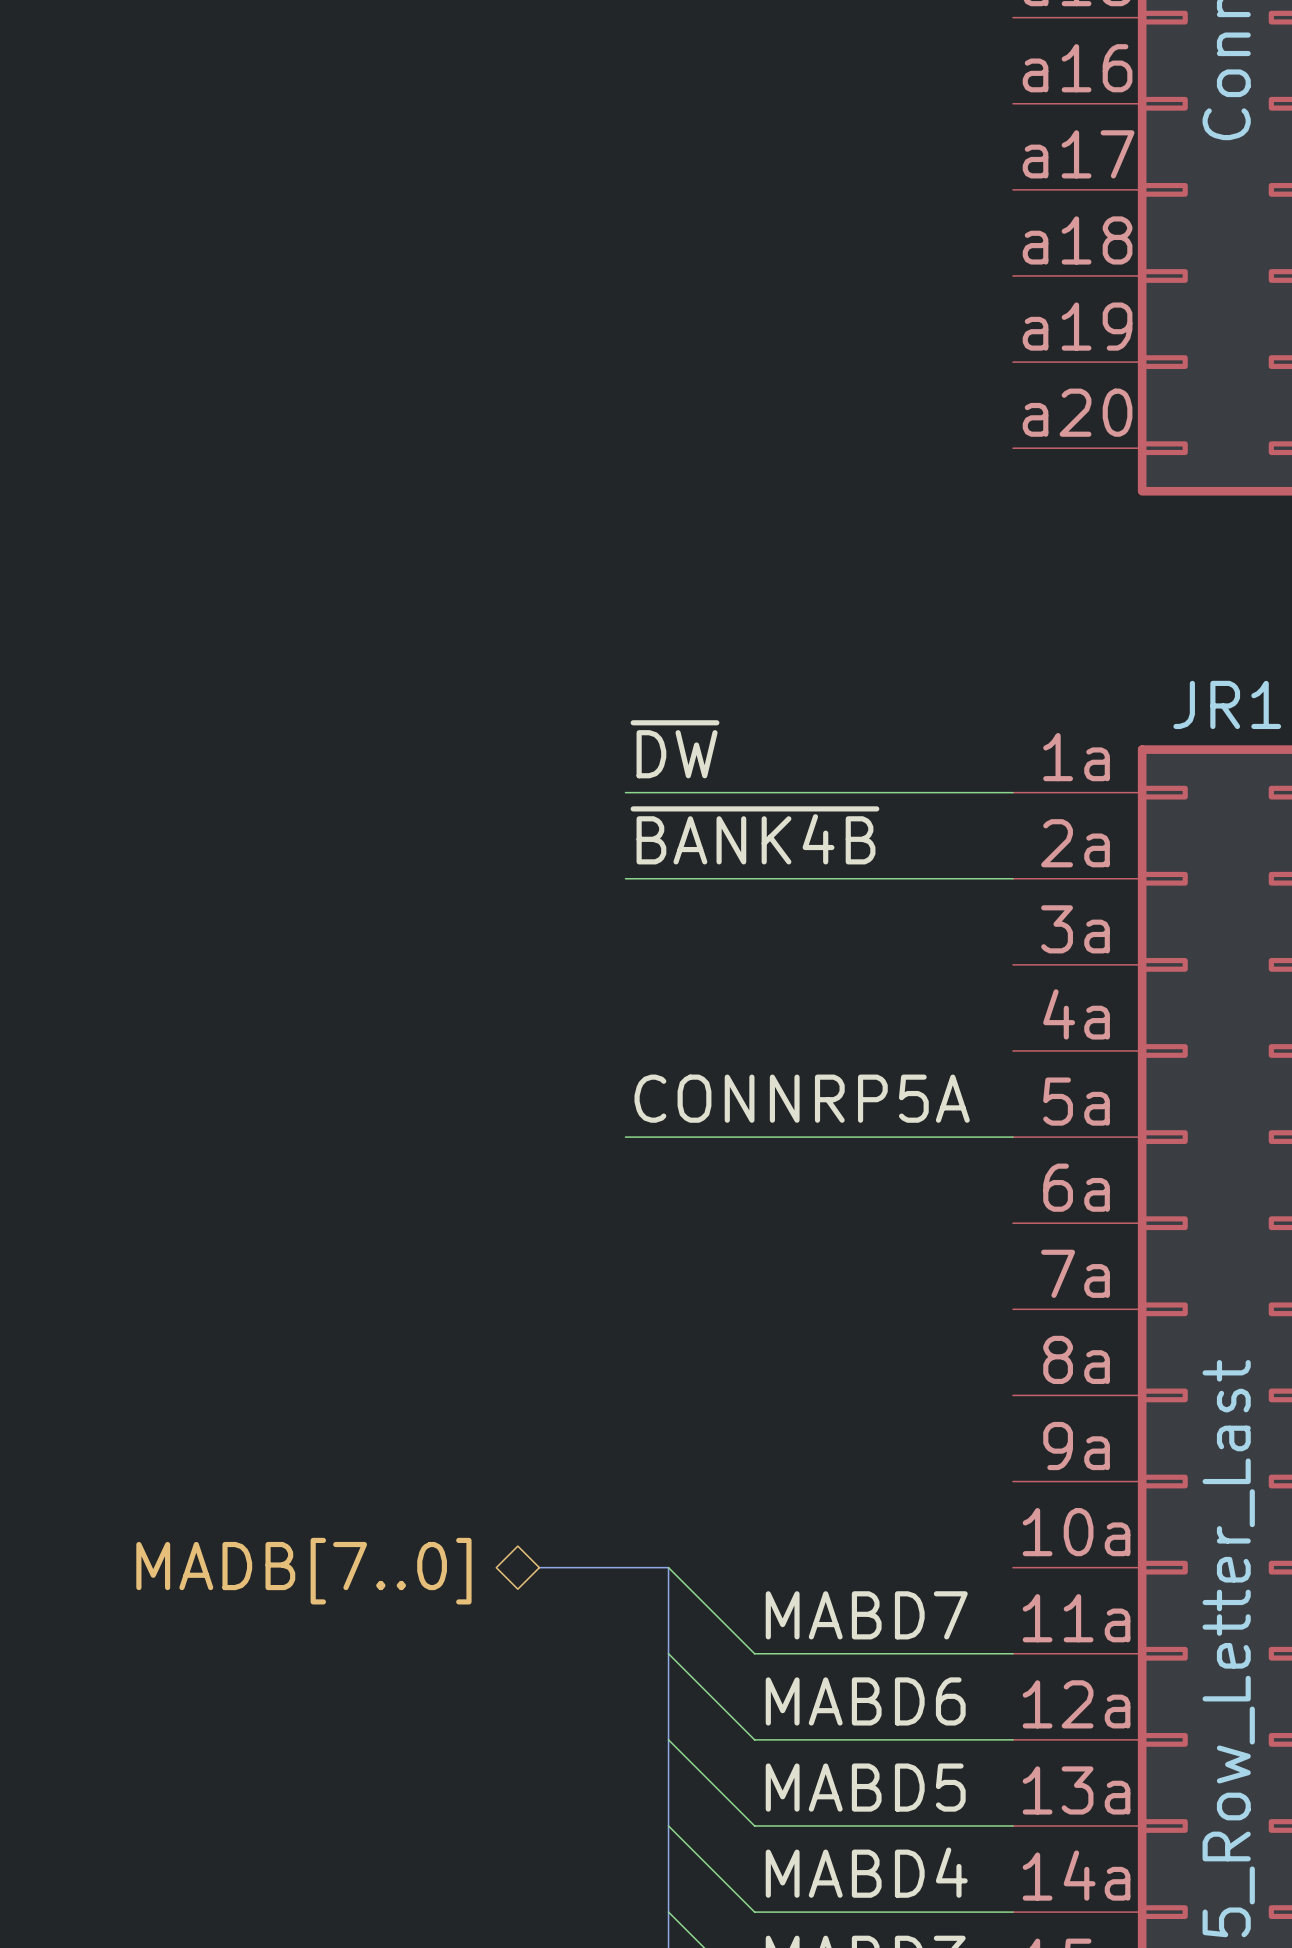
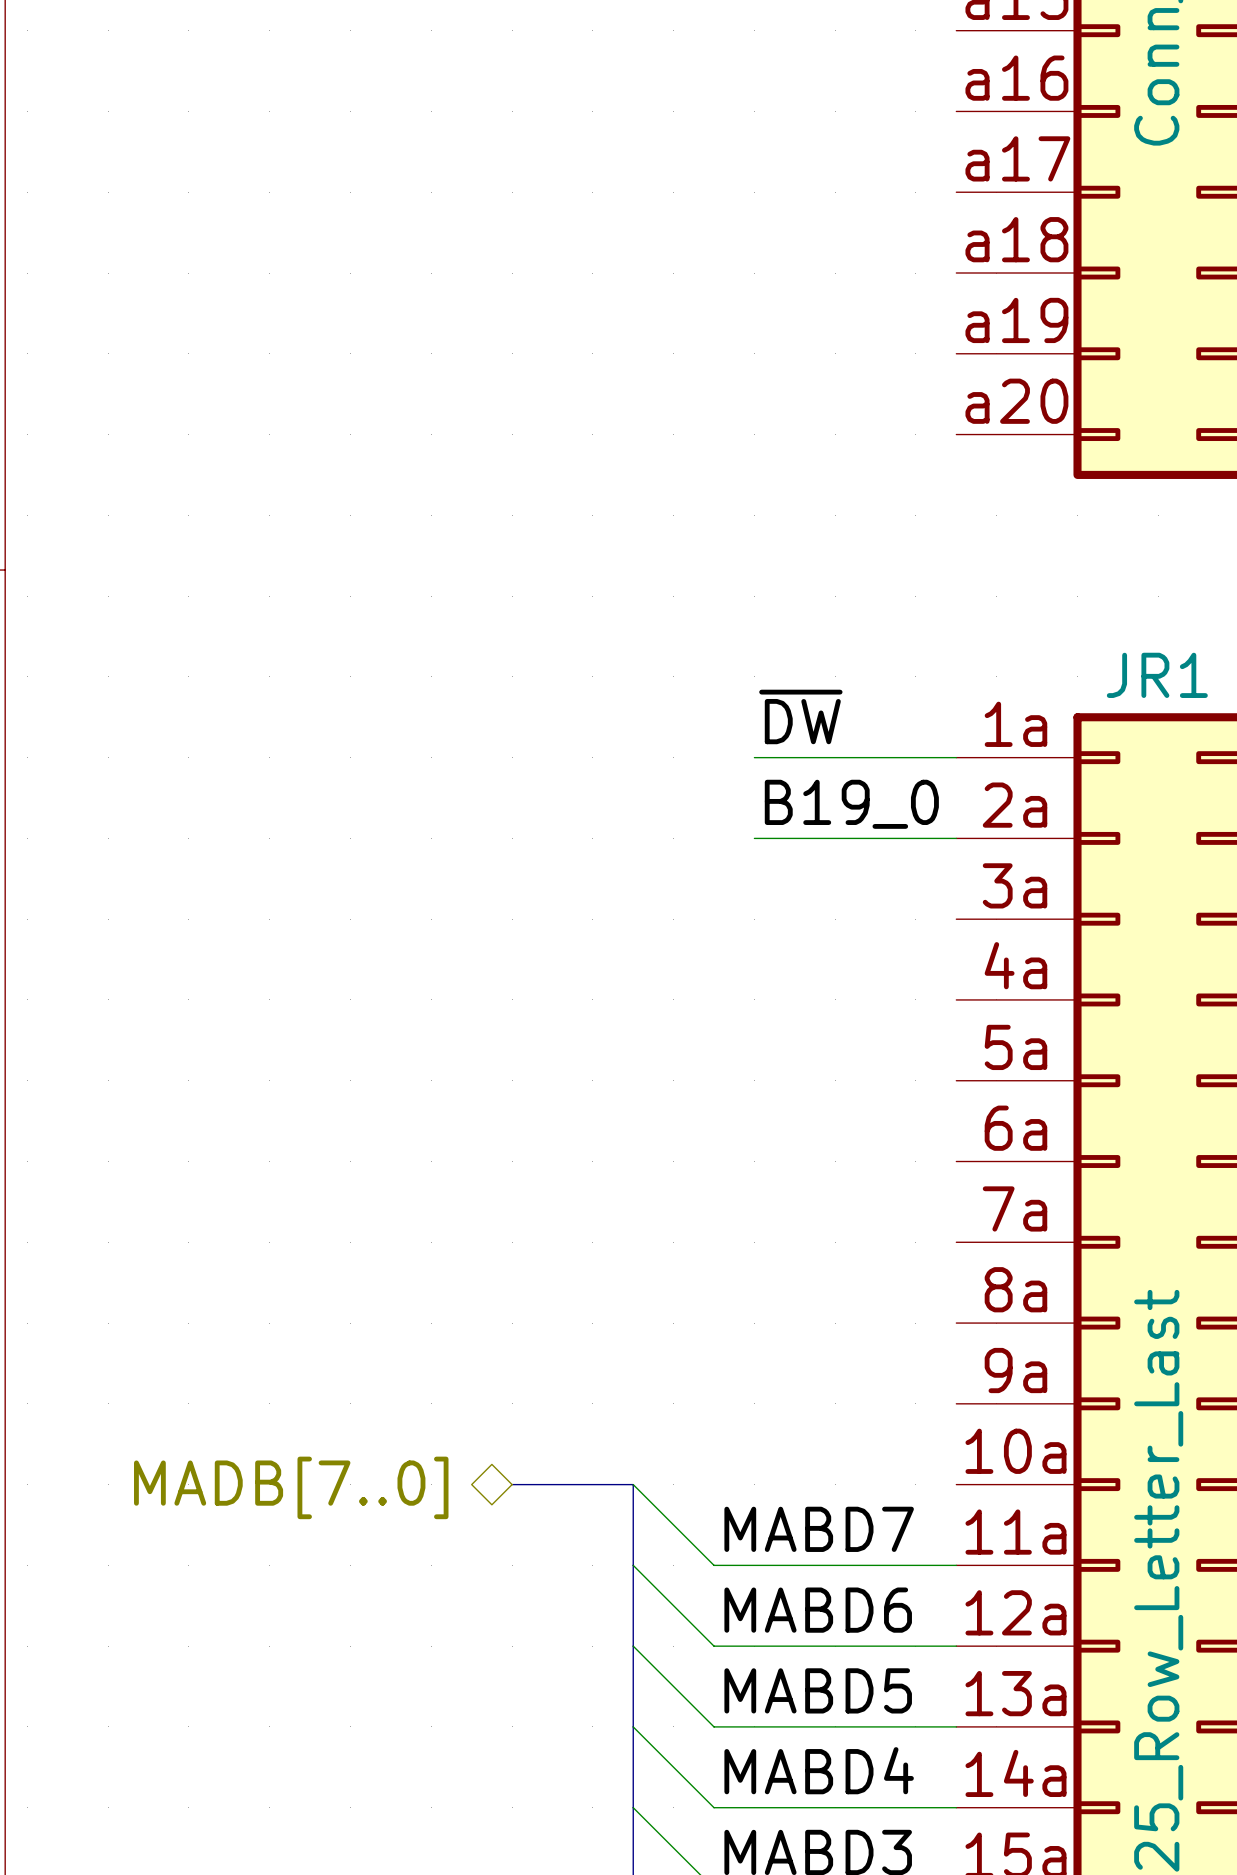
label position: ~{DW} (675, 749) -> ~{DW} (800, 716)
wire: (625, 792) (797, 792) -> none
label: ~{BANK4B} (754, 835) -> none
label: none -> B19_0 (851, 804)
wire: (625, 878) (797, 878) -> none
label: CONNRP5A (802, 1098) -> none
wire: (625, 1137) (1012, 1137) -> none

